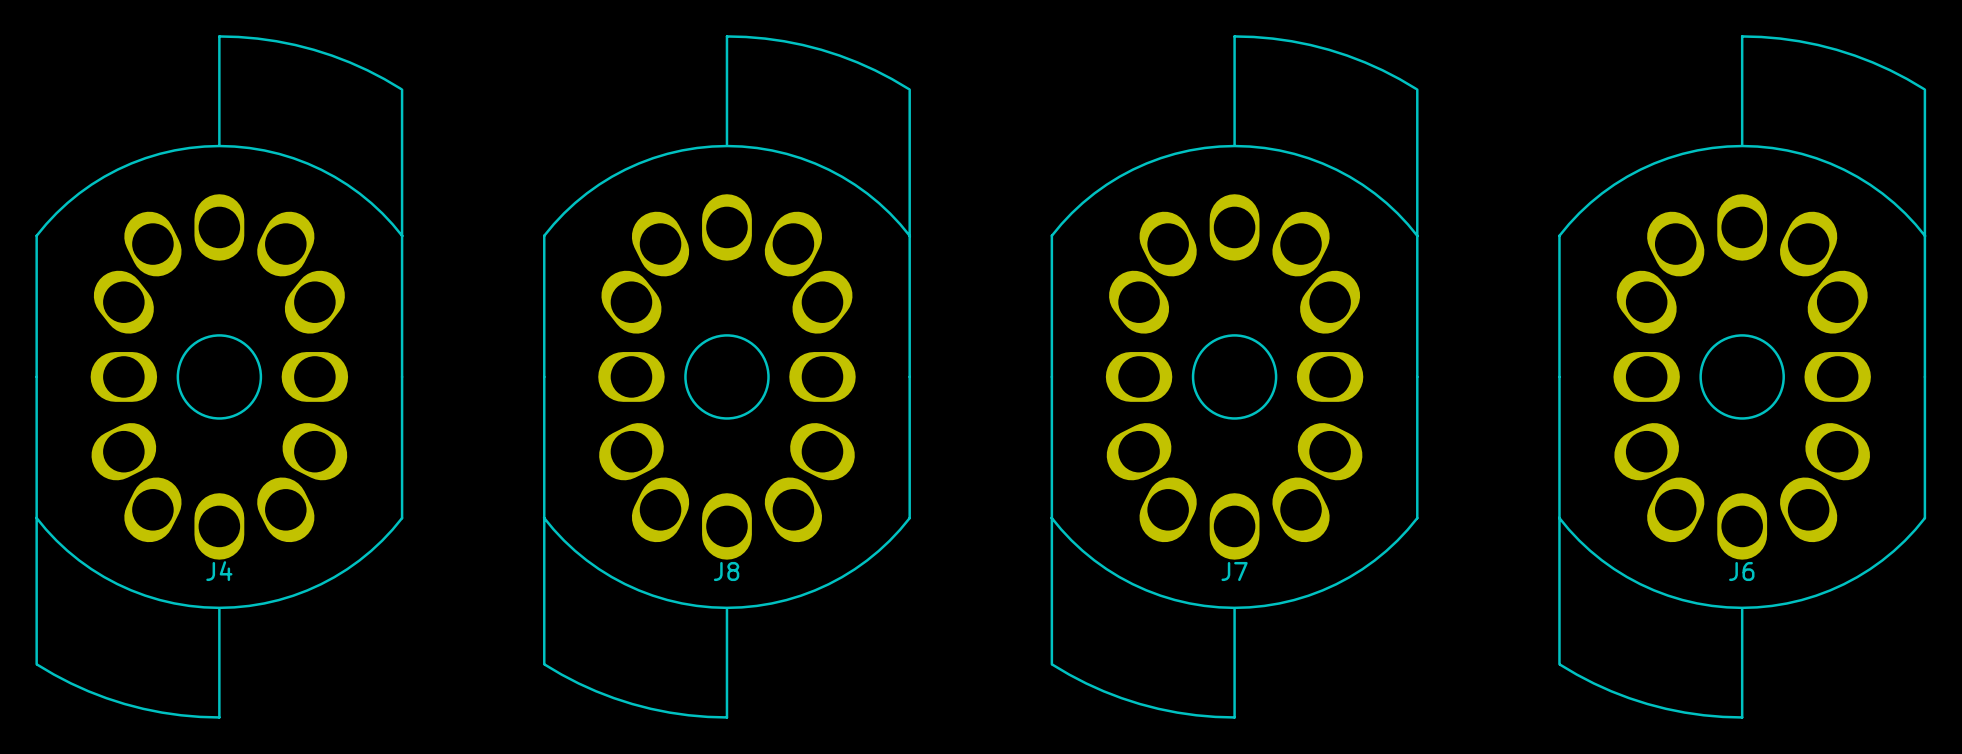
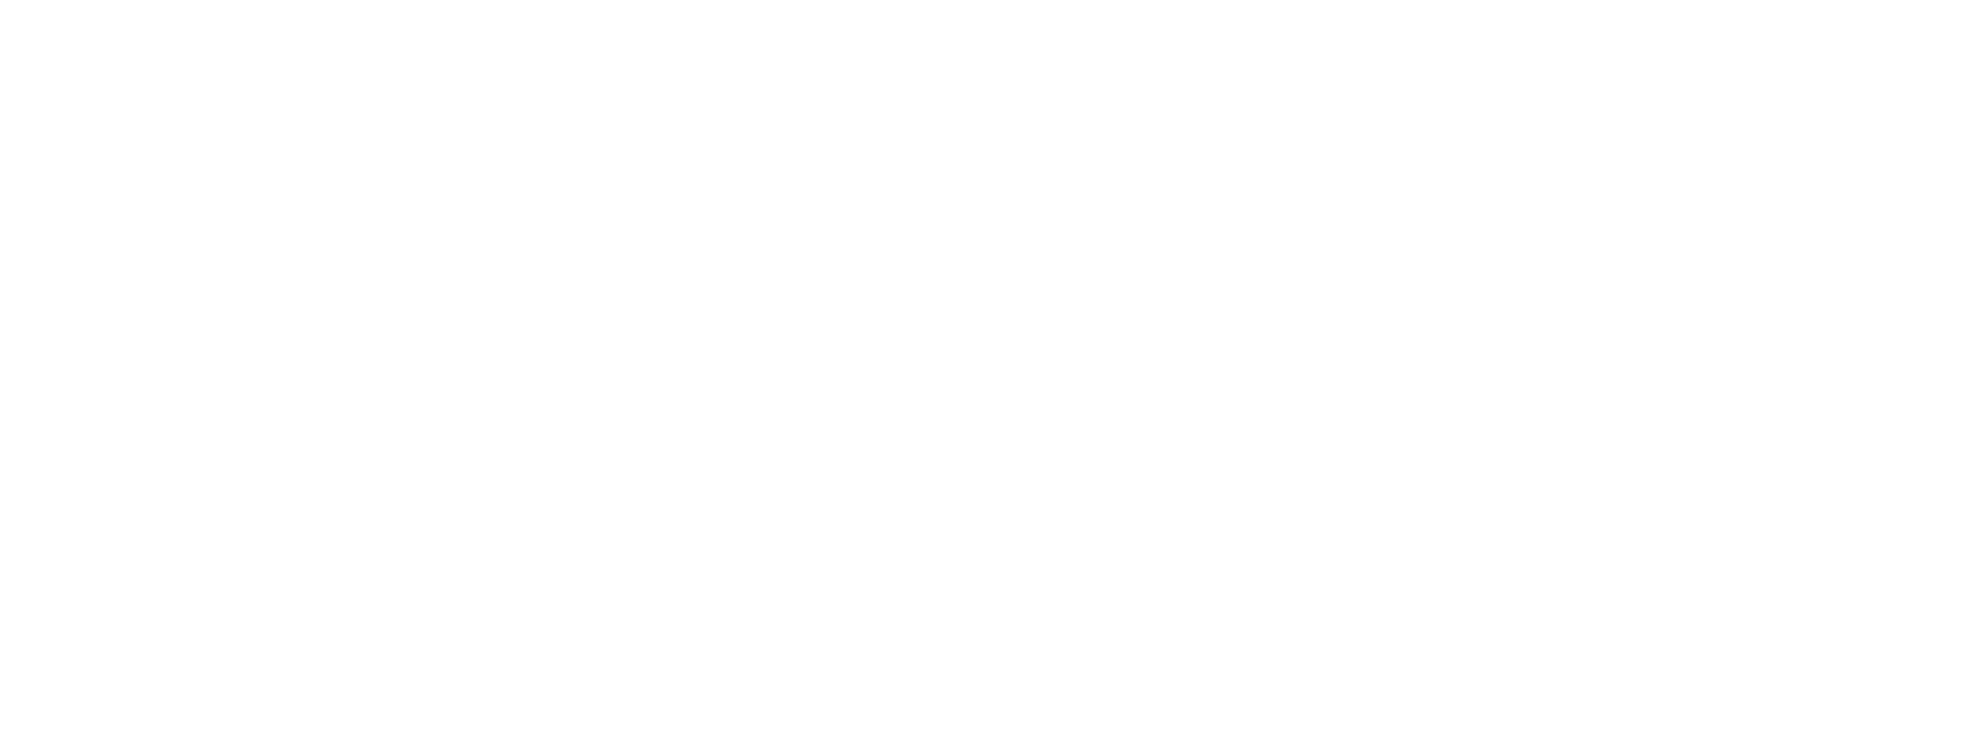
J4: (219, 376) -> none
J8: (726, 376) -> none
J7: (1234, 376) -> none
J6: (1742, 376) -> none

